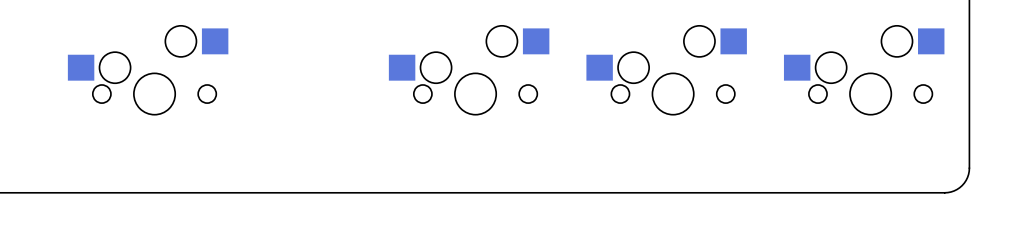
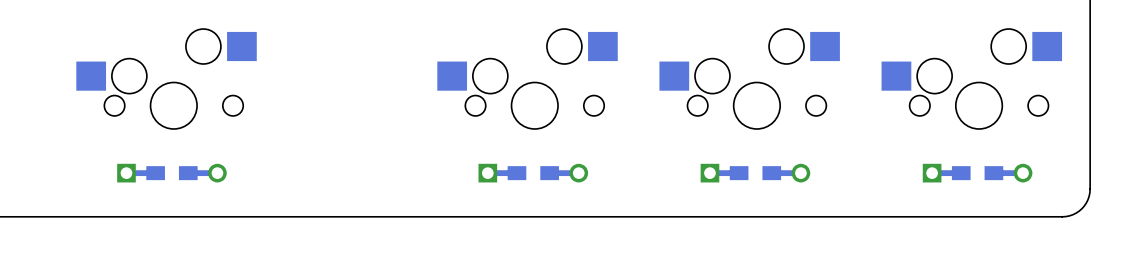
part: none -> (171, 173)
part: none -> (533, 173)
part: none -> (755, 173)
part: none -> (977, 173)

